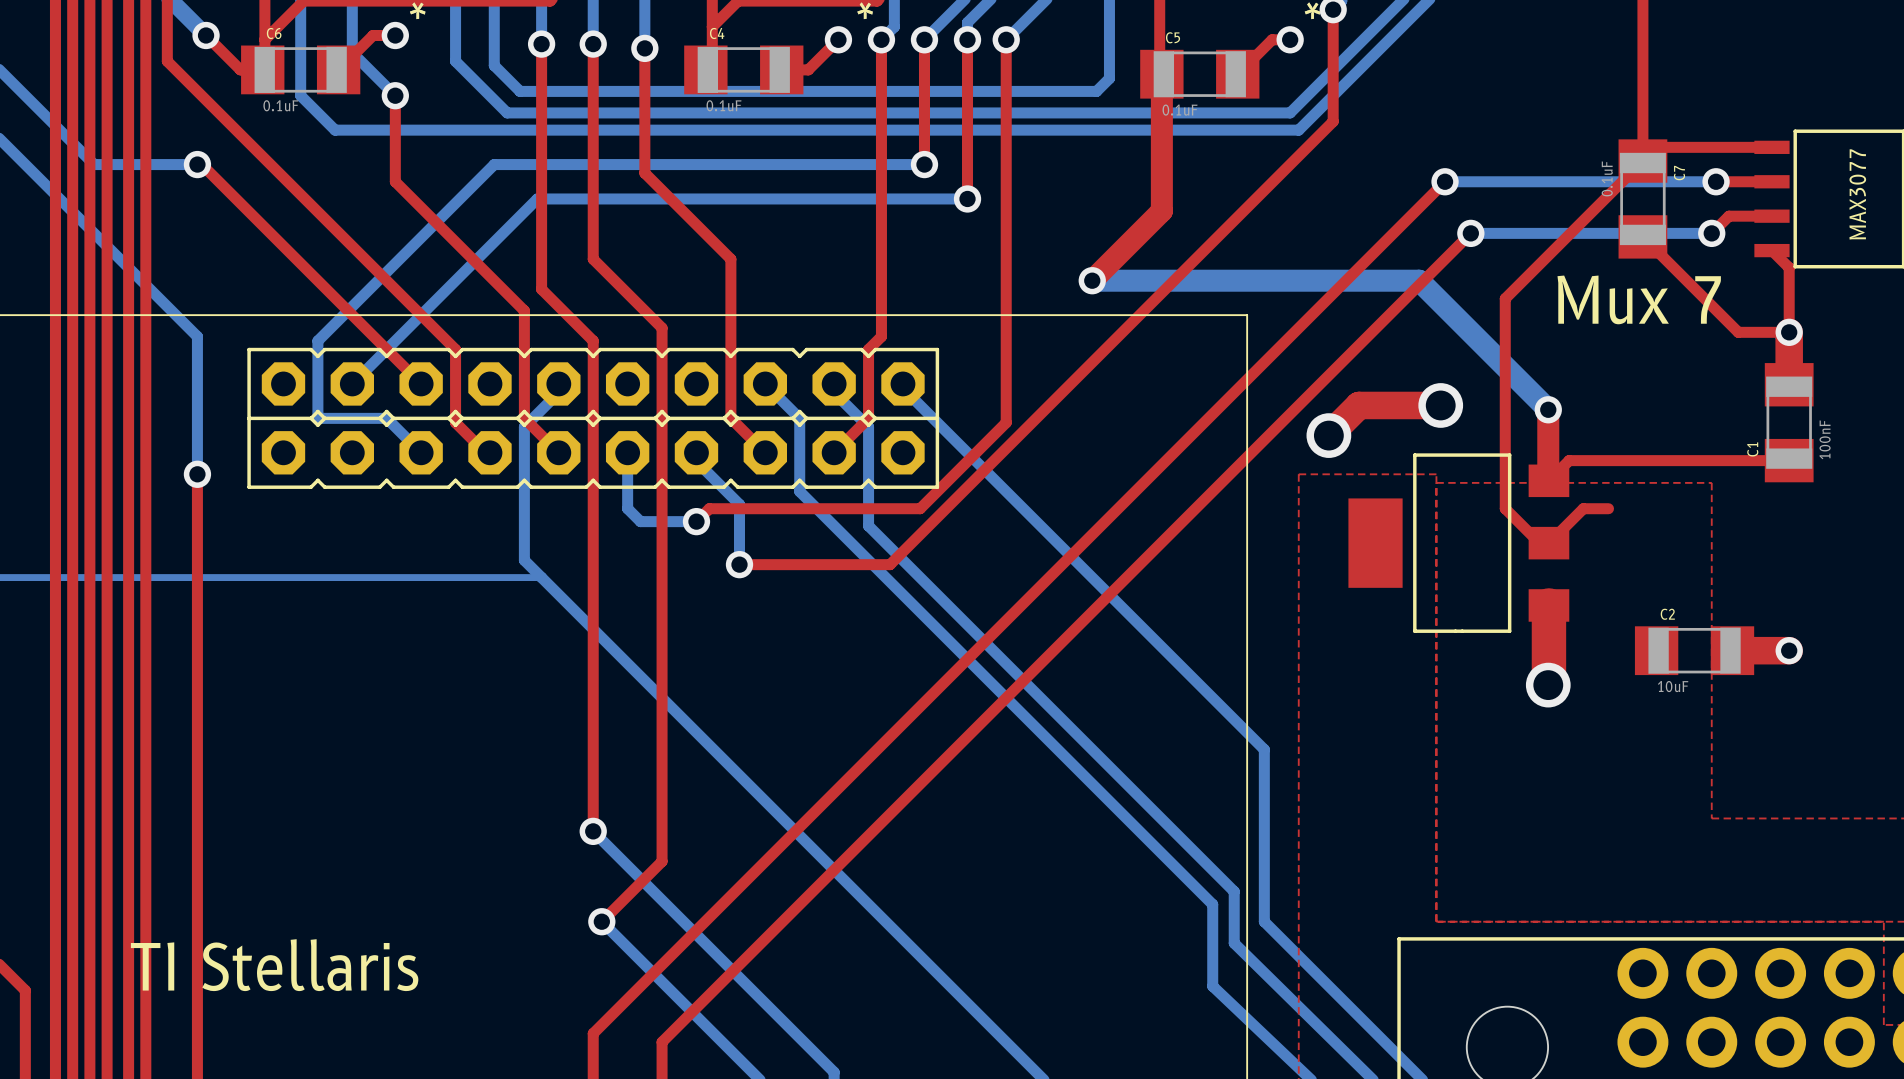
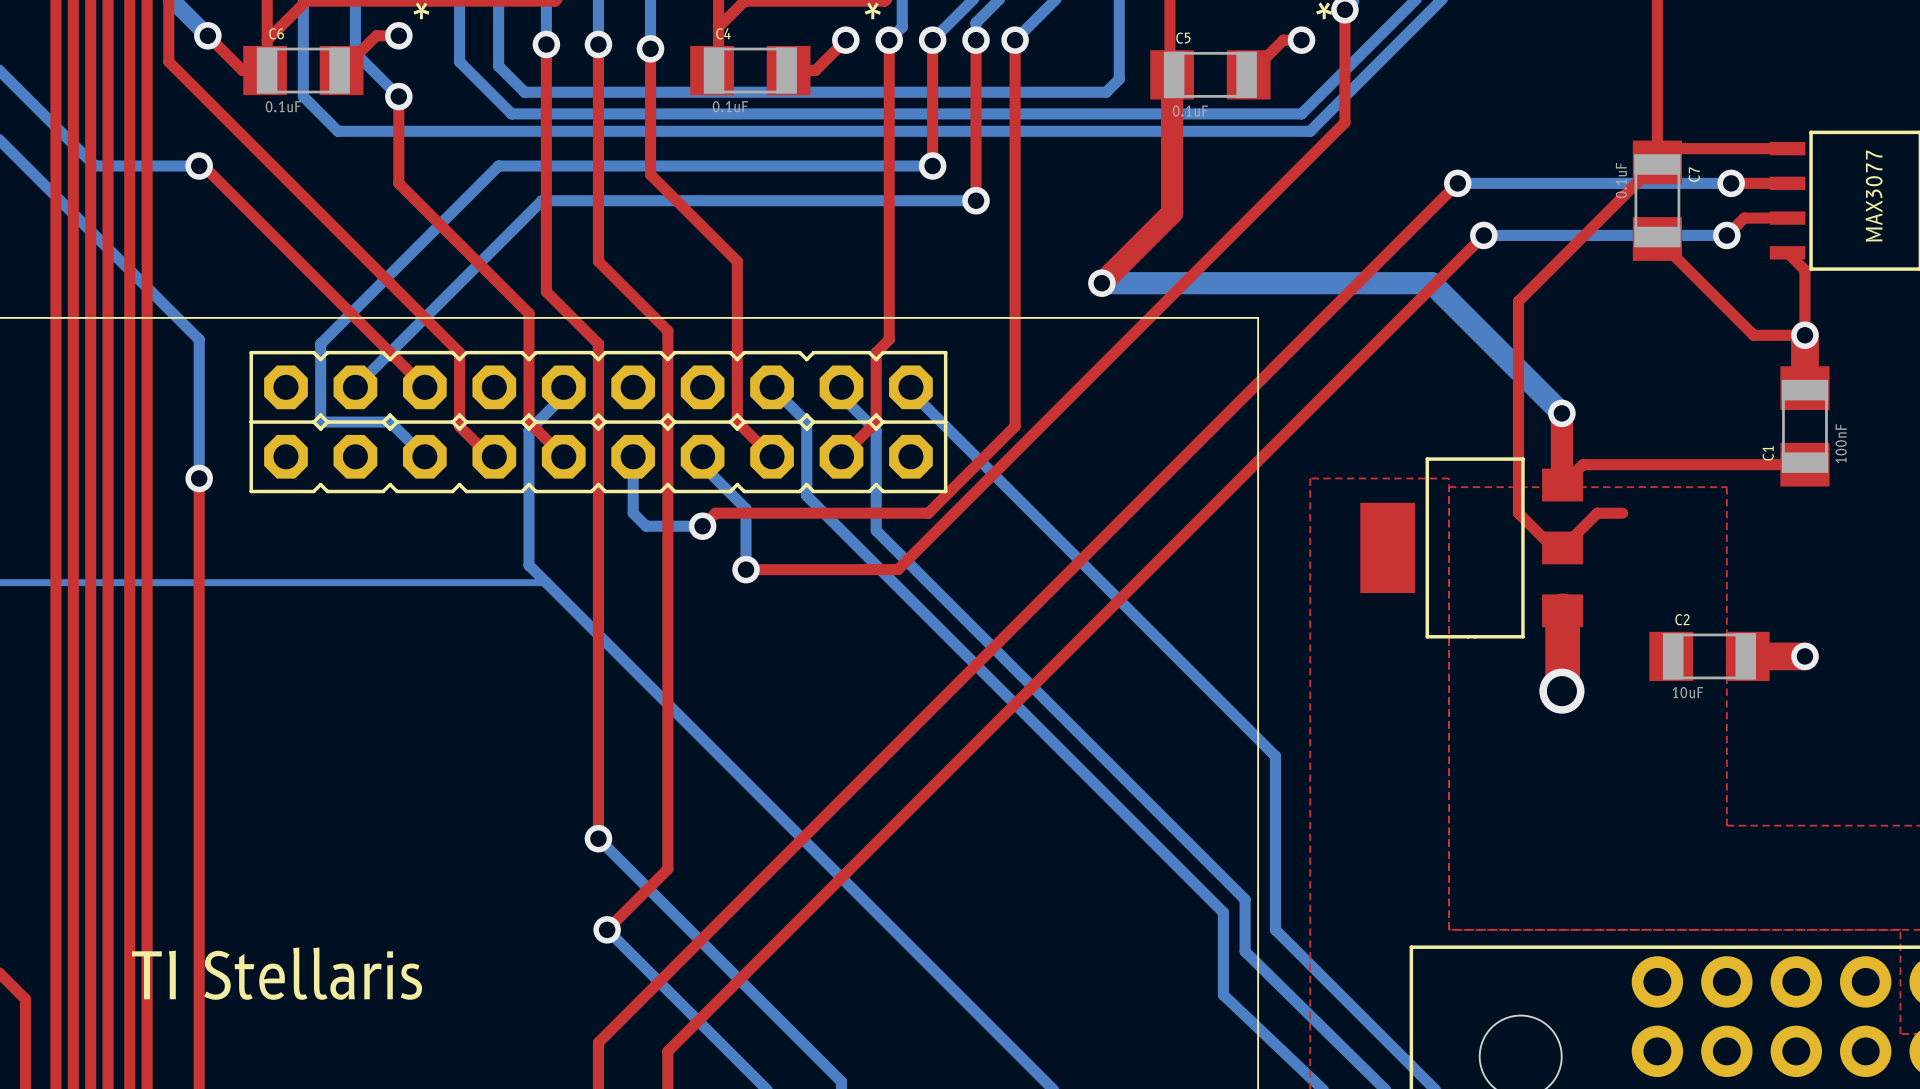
text: Mux 7 (1639, 299) -> none
top track: (1440, 405) (1358, 405) (1328, 435) -> none
via: (1440, 405) -> none
via: (1328, 435) -> none

